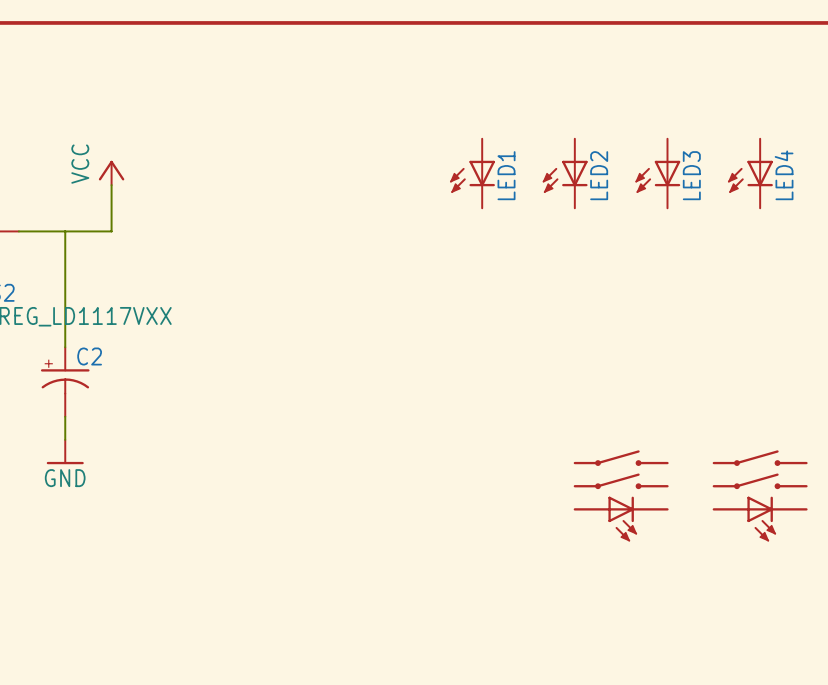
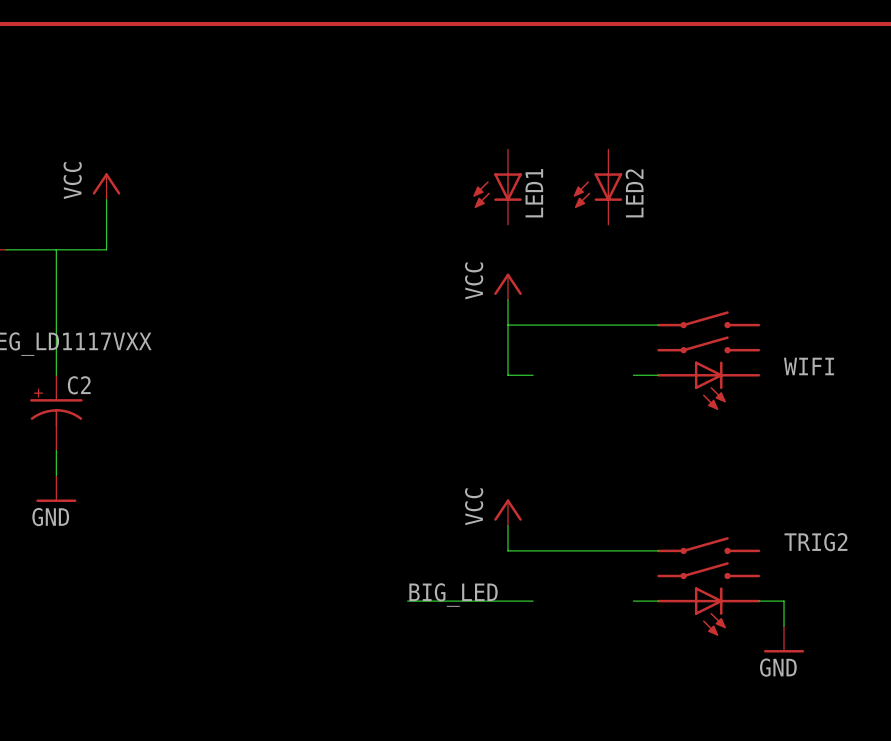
LED3: (657, 173) -> none
LED4: (750, 173) -> none
power symbol: none -> VCC (508, 286)
wire: none -> (508, 300) (508, 375) (533, 375)
wire: none -> (508, 325) (658, 325)
part: none -> (708, 360)
label: none -> WIFI (809, 366)
wire: none -> (633, 375) (658, 375)
power symbol: none -> VCC (508, 512)
wire: none -> (508, 525) (508, 550) (658, 550)
part: (621, 495) -> none
part: (760, 495) -> none
label: none -> TRIG2 (815, 542)
part: none -> (708, 586)
label: none -> BIG_LED (453, 595)
wire: none -> (407, 601) (533, 601)
wire: none -> (633, 601) (658, 601)
wire: none -> (758, 601) (784, 601) (784, 626)
power symbol: none -> GND (784, 639)

